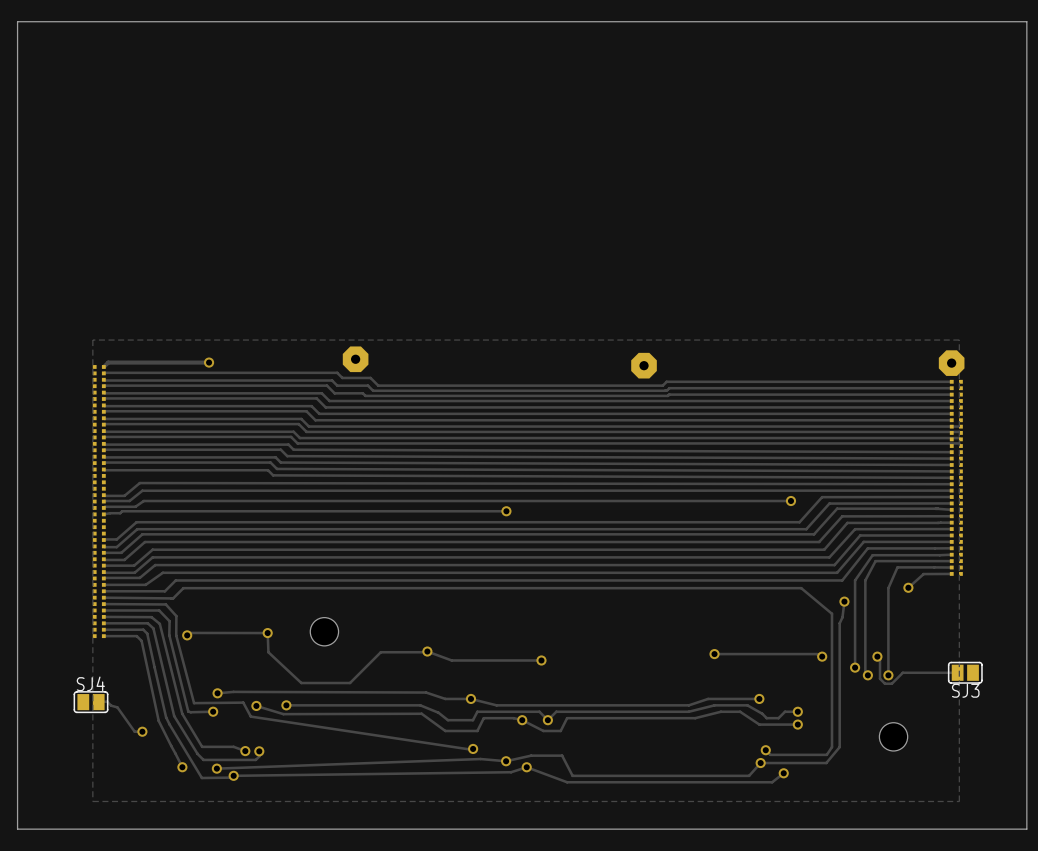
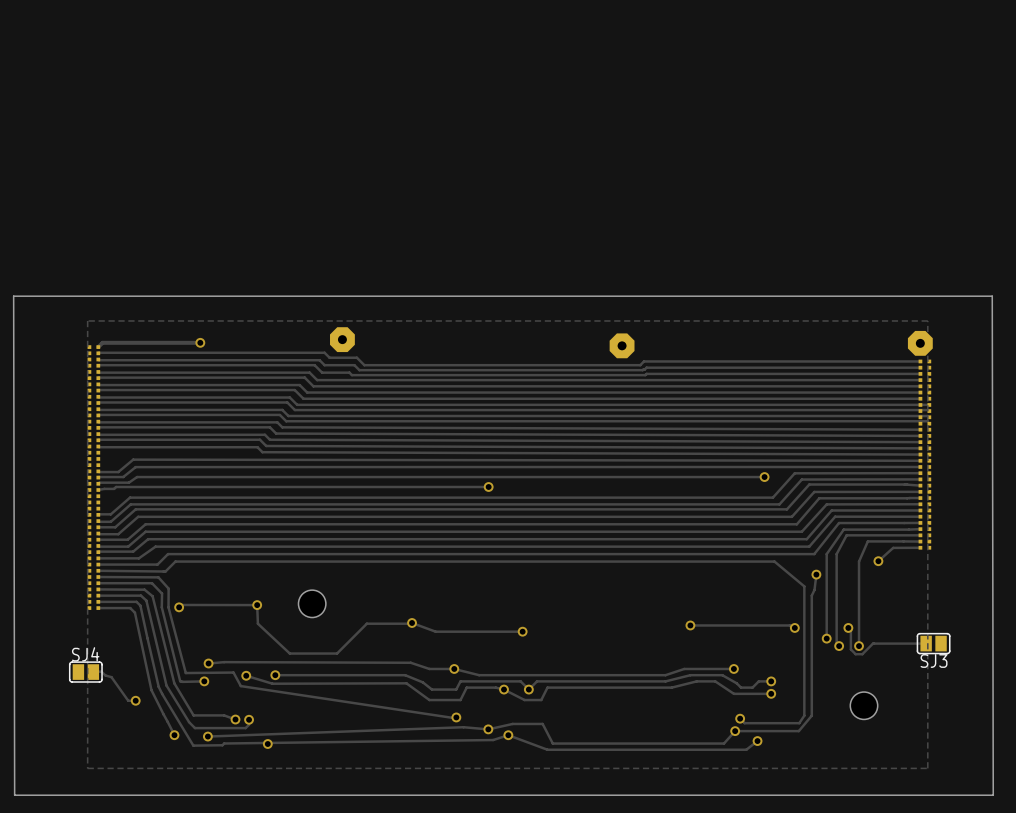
via position: (233, 775) -> (267, 744)
board edge: (1026, 829) (1026, 21) (17, 21) (17, 829) -> (993, 795) (992, 296) (13, 296) (14, 795)

